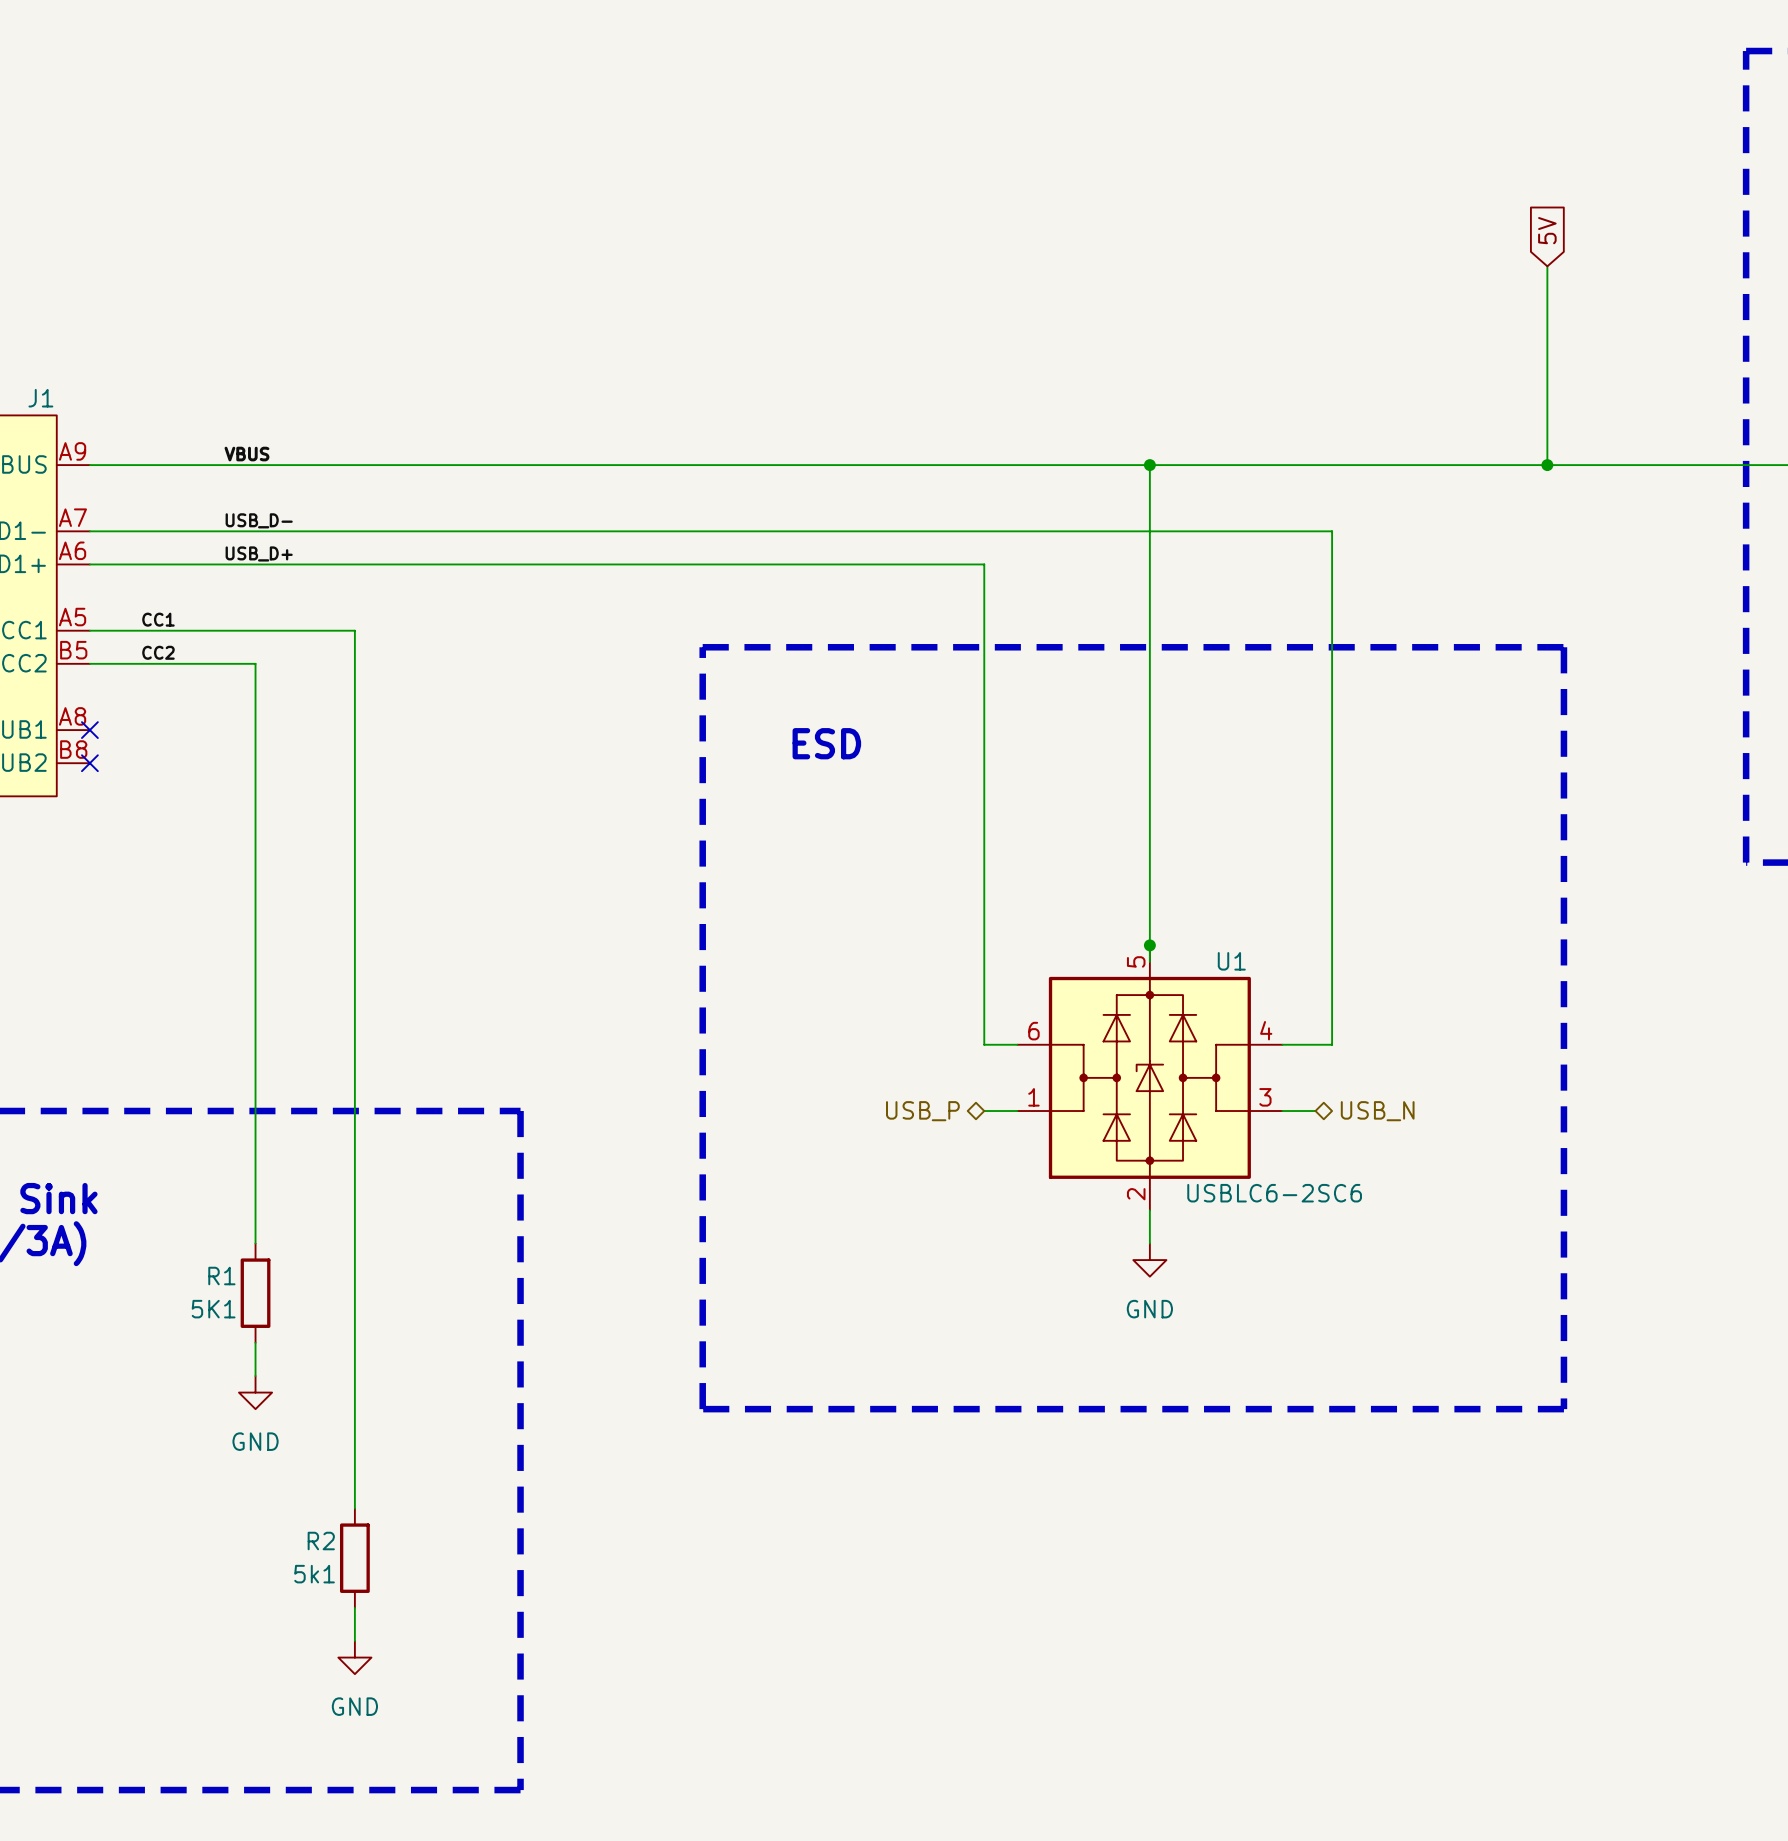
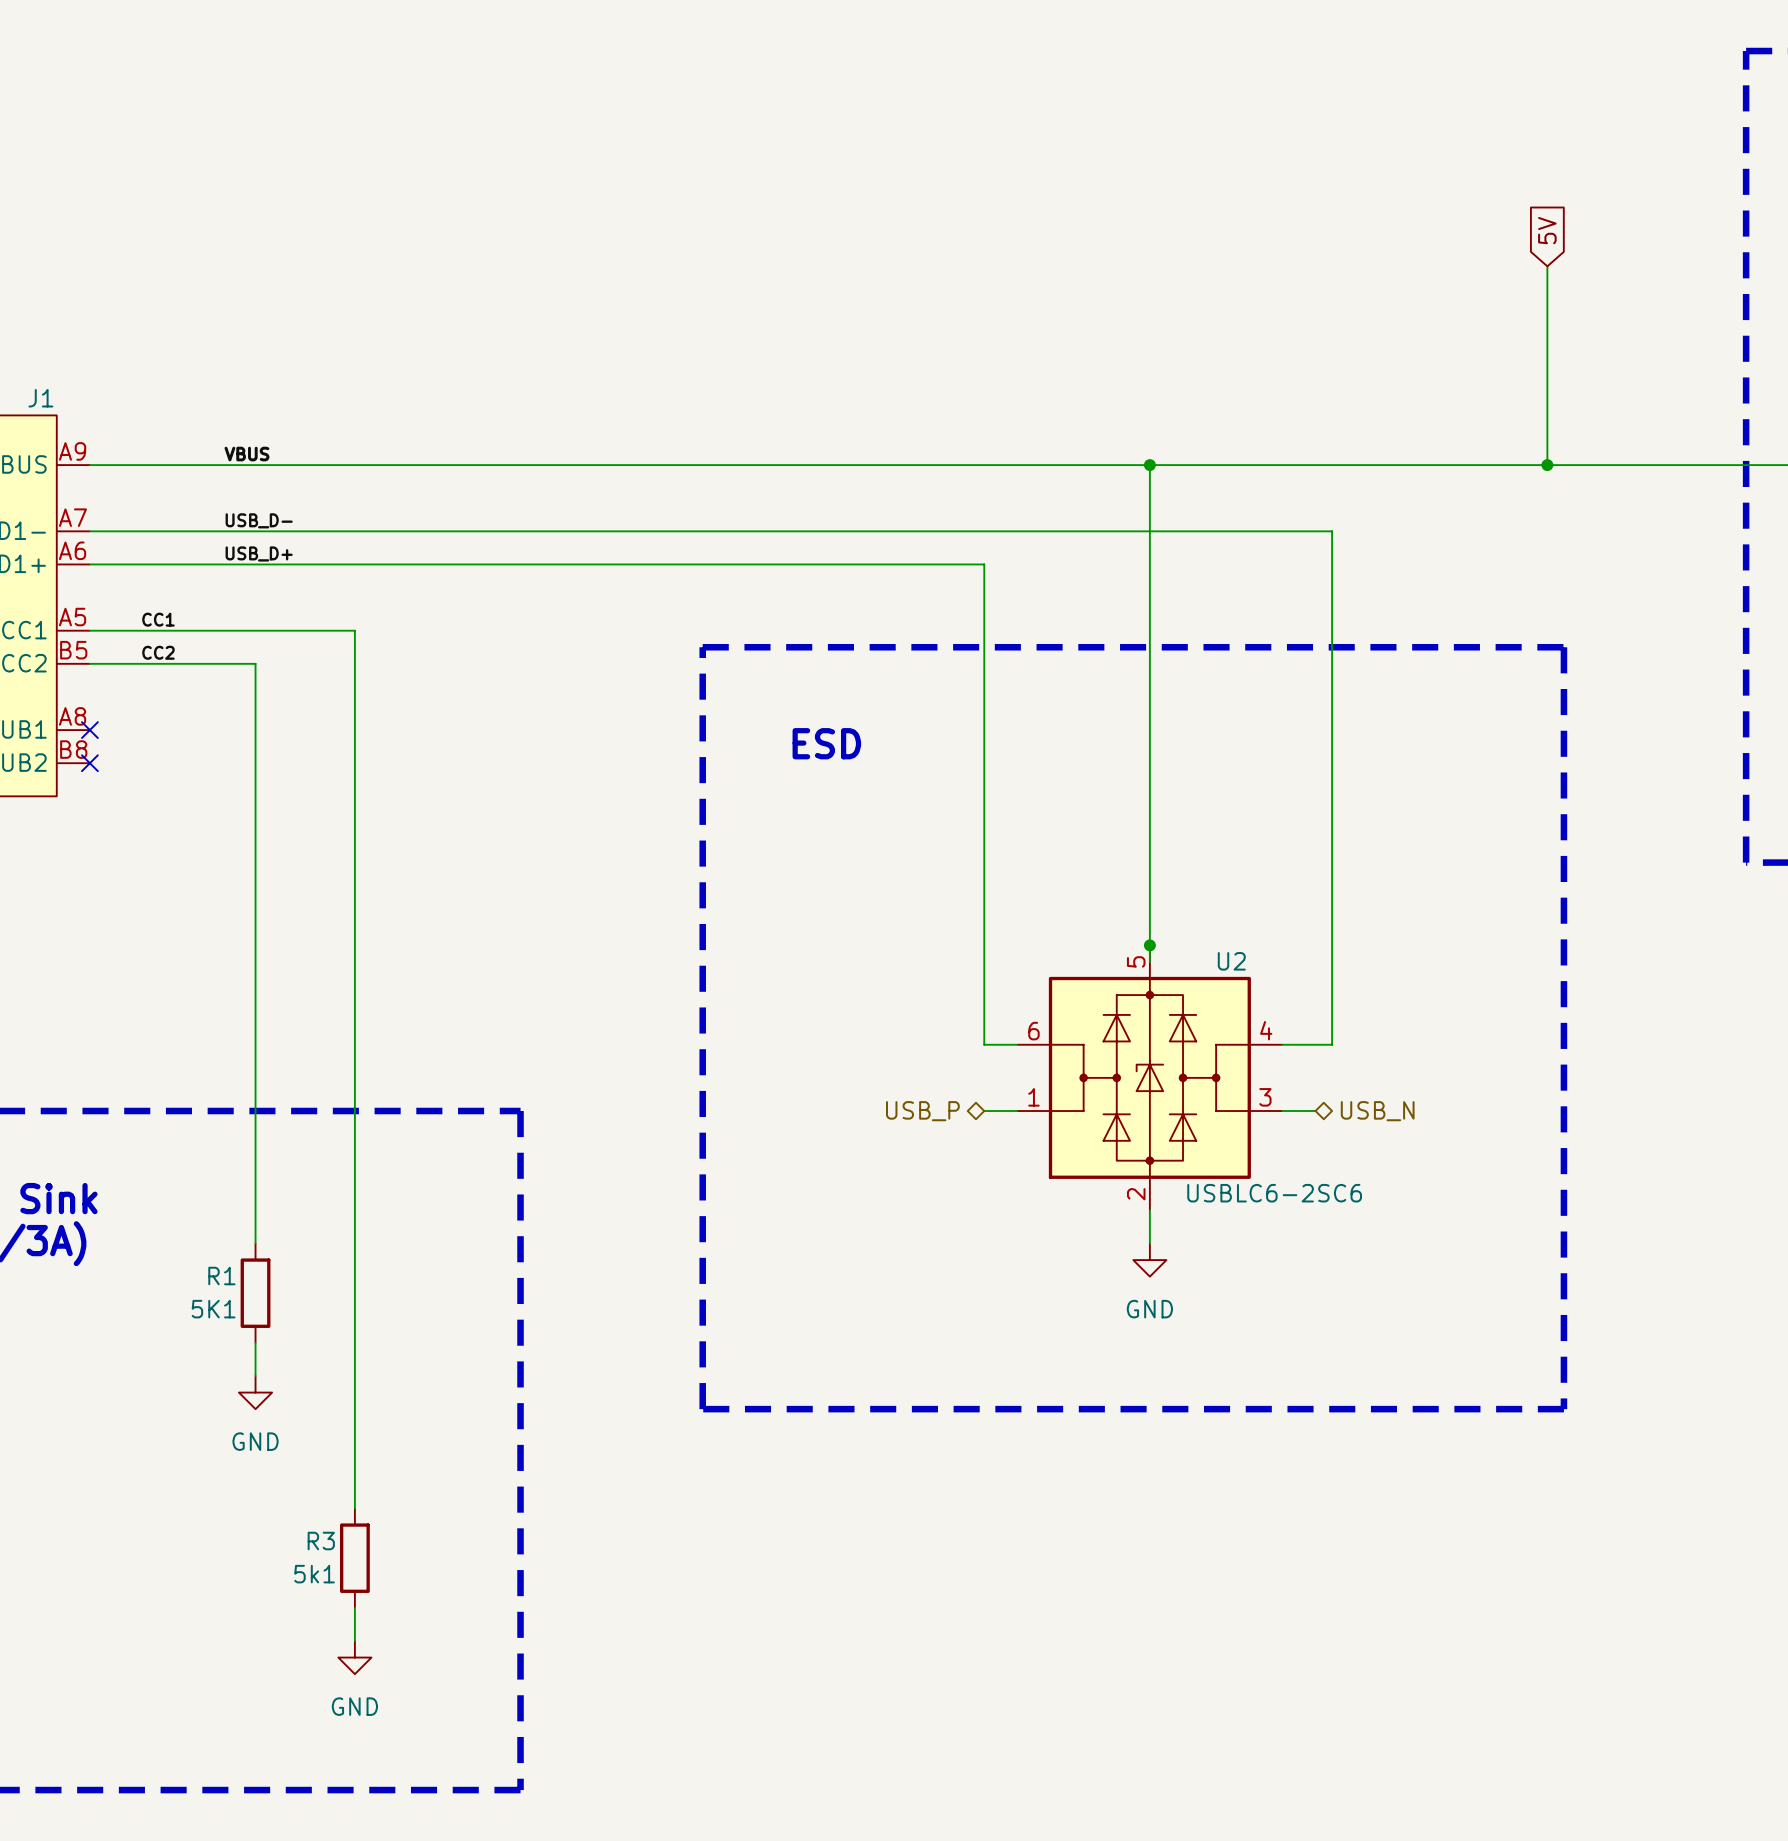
U1 name: U1 (1231, 961) -> U2 (1231, 961)
R2 name: R2 (321, 1541) -> R3 (321, 1541)

